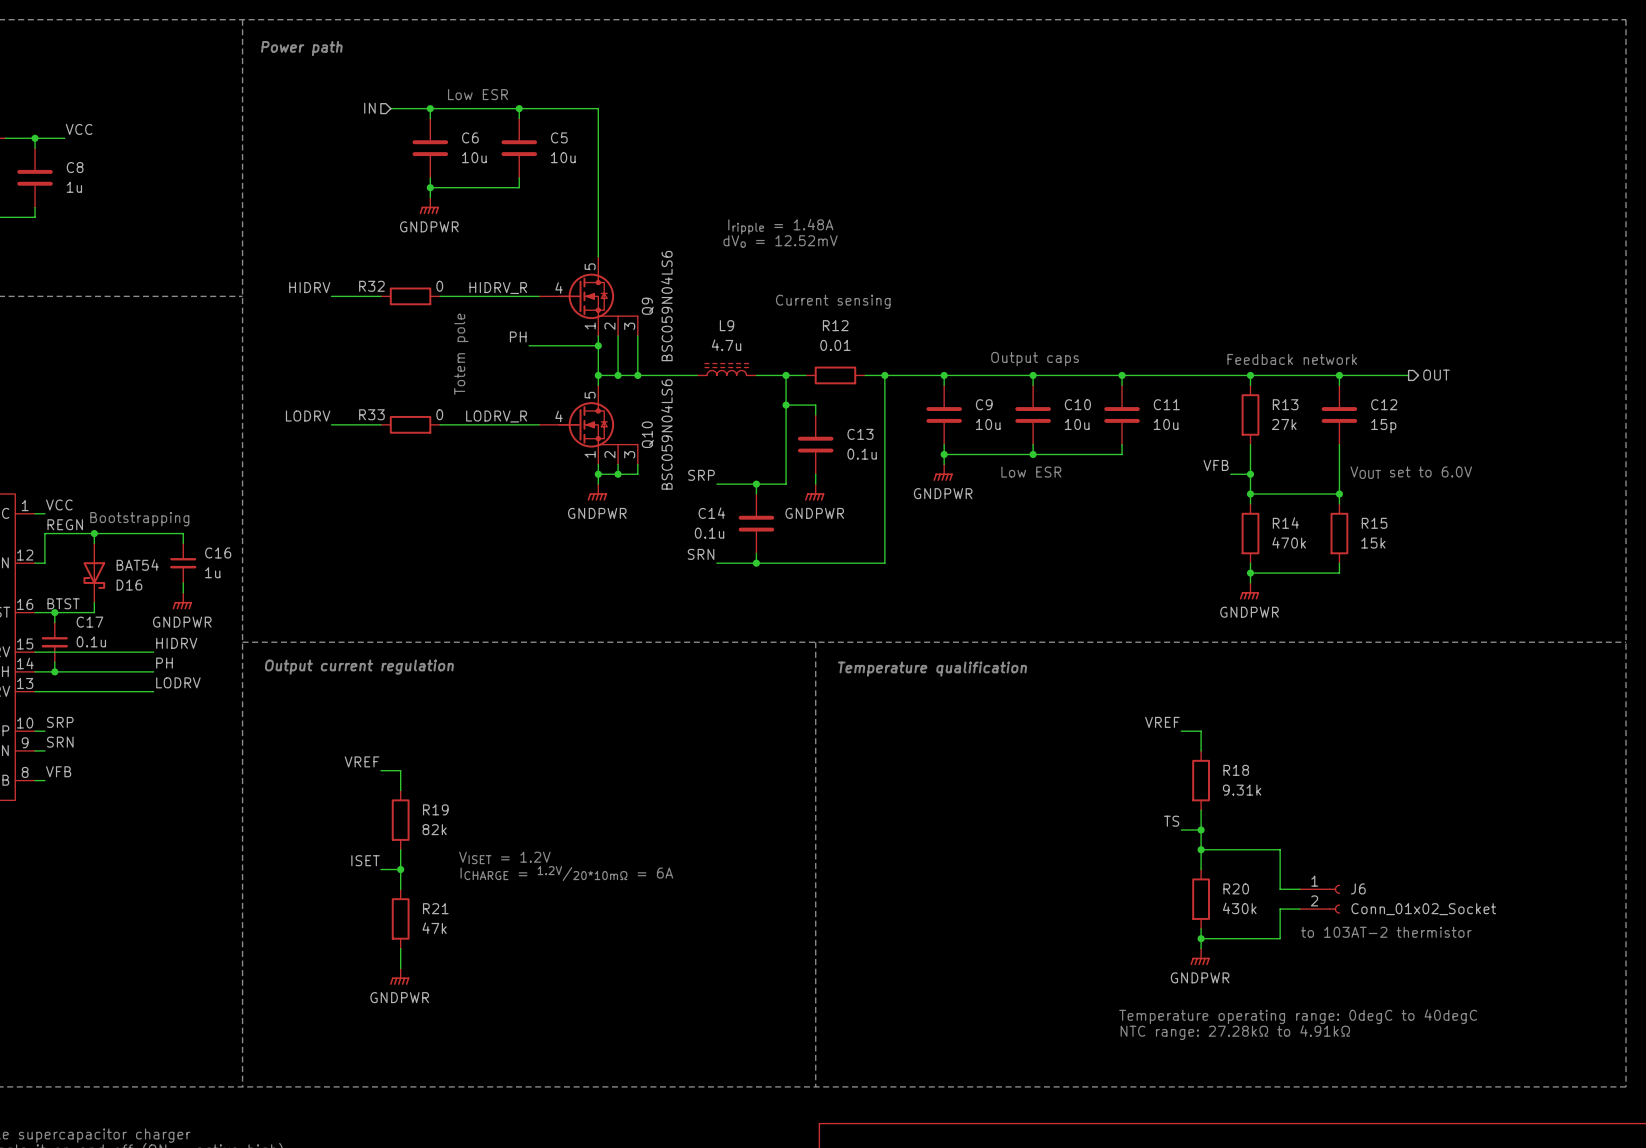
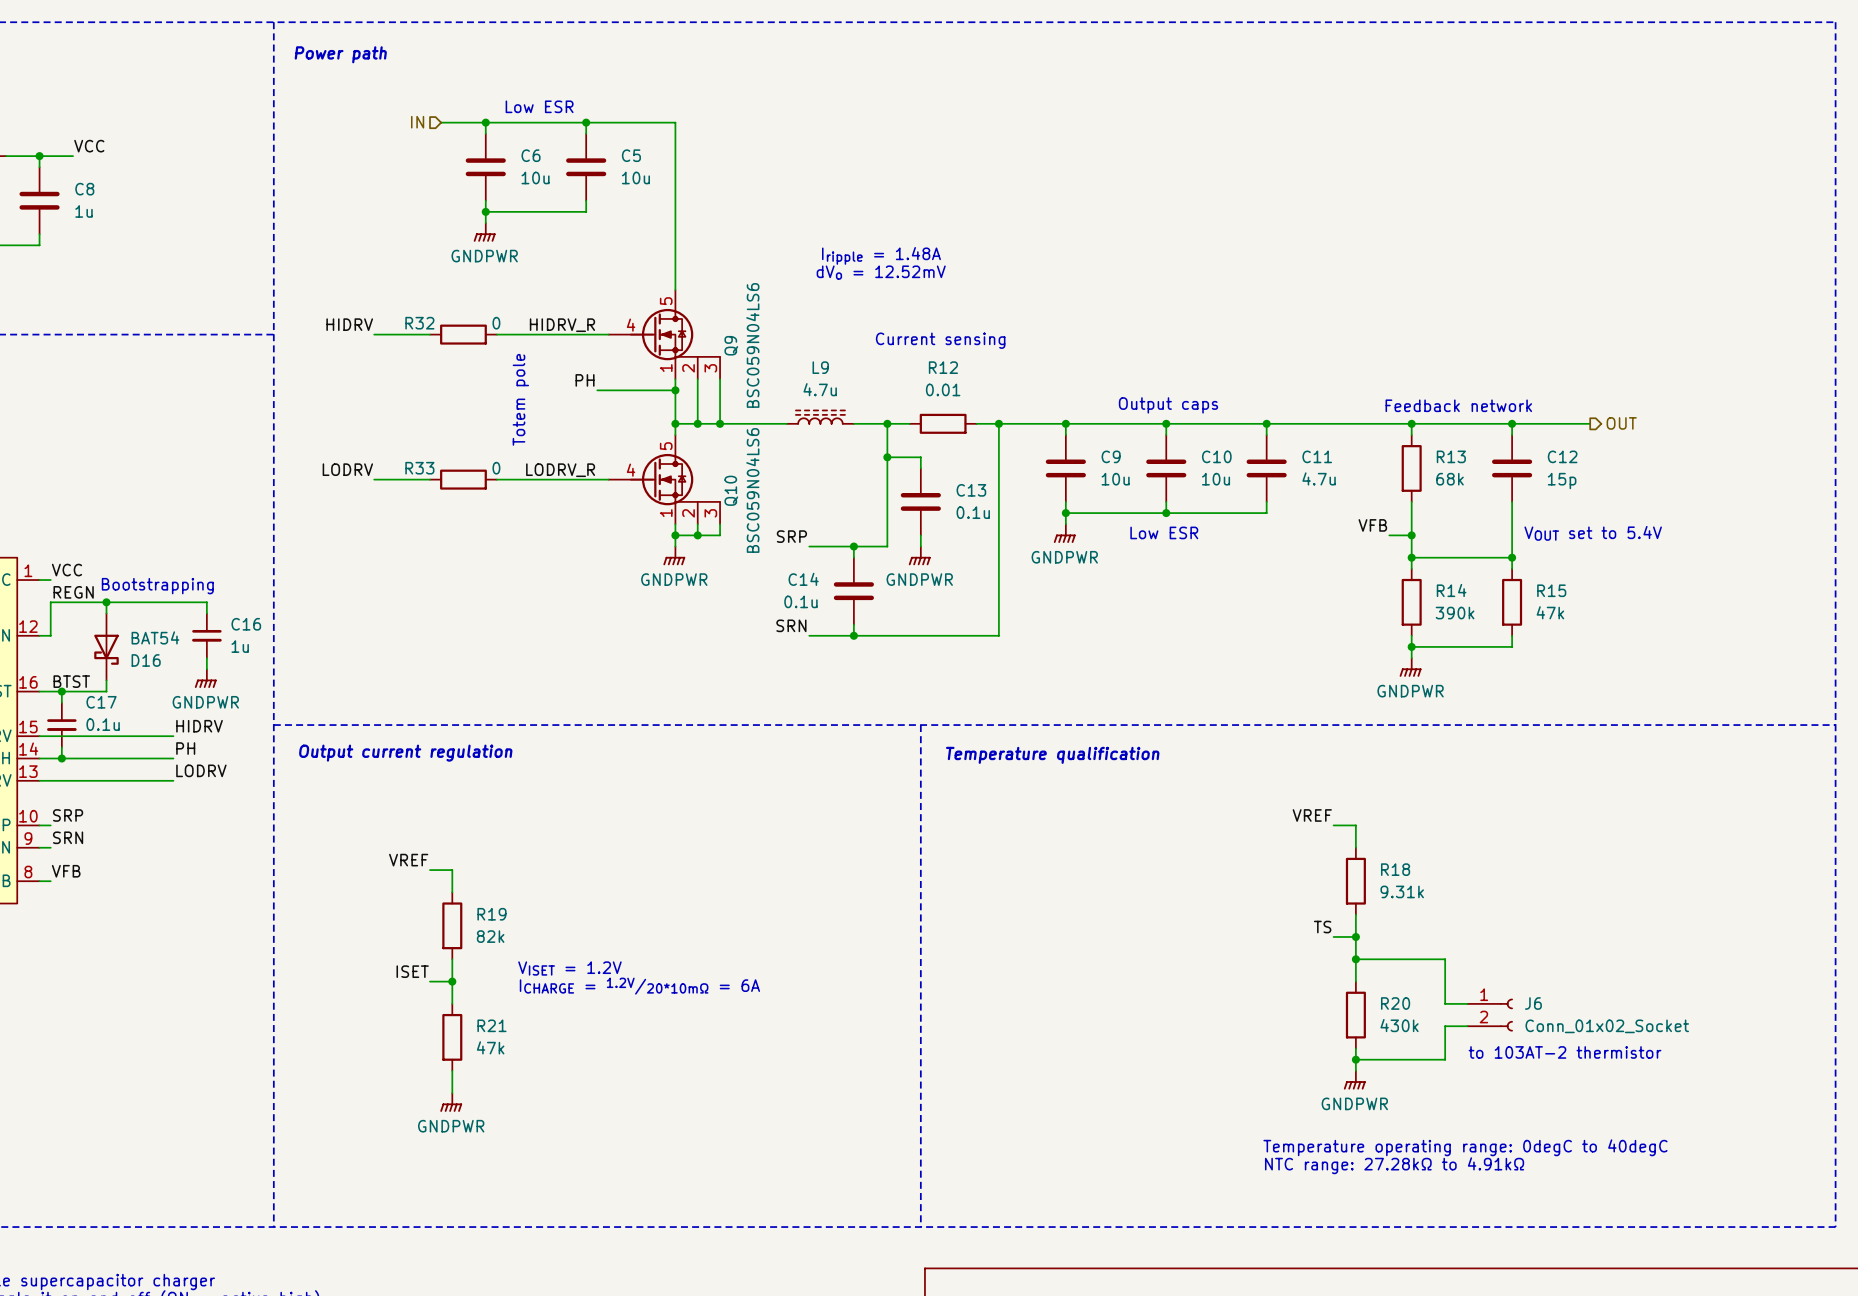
C11 value: 10u (1166, 424) -> 4.7u (1319, 478)
R13 value: 27k (1284, 424) -> 68k (1450, 479)
text: VOUT set to 6.0V (1411, 472) -> VOUT set to 5.4V (1593, 533)
R14 value: 470k (1289, 542) -> 390k (1455, 613)
R15 value: 15k (1373, 543) -> 47k (1550, 612)

